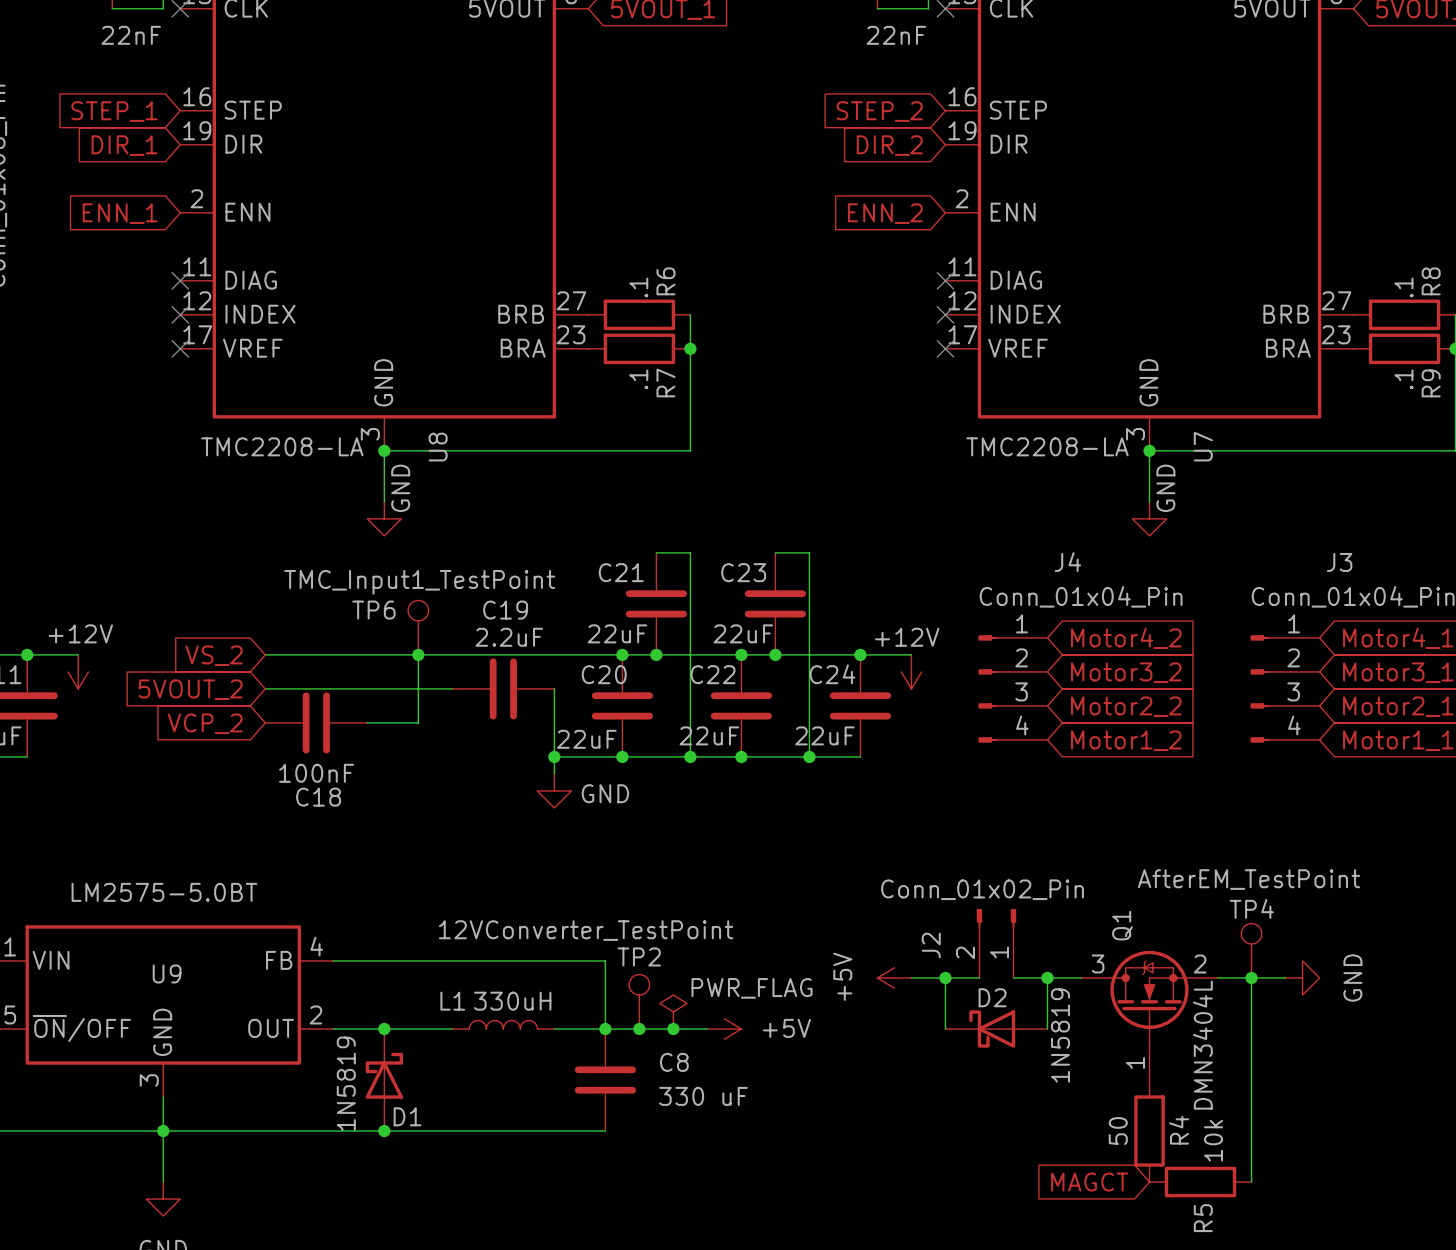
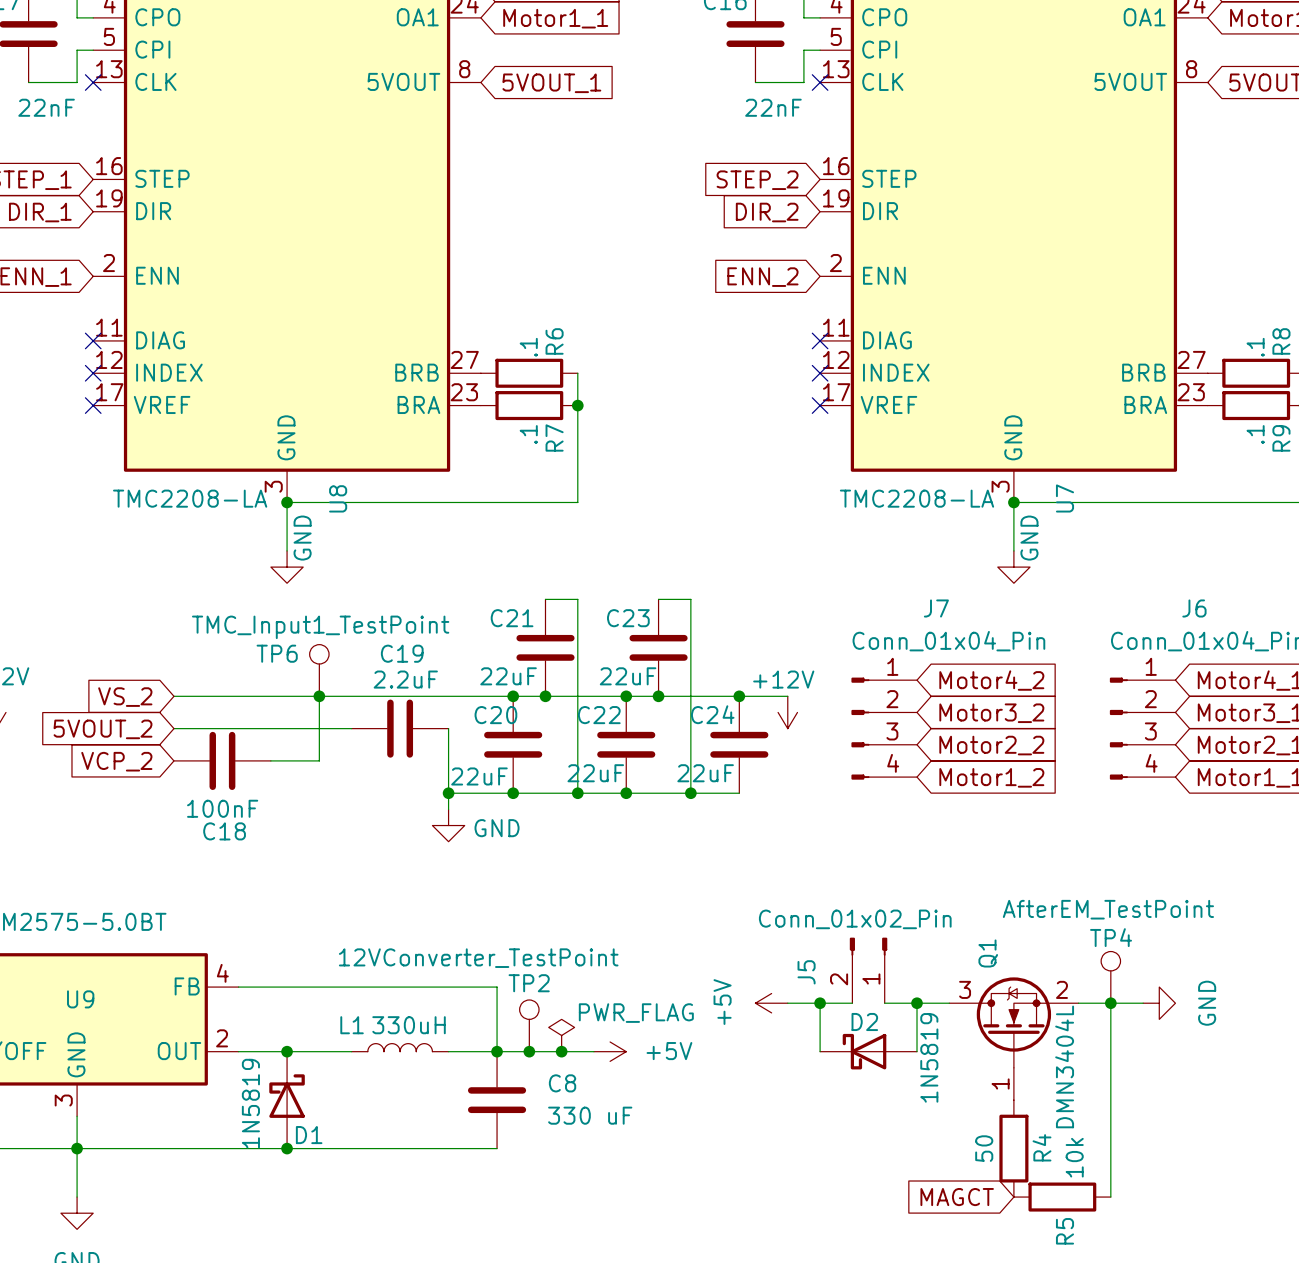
J4 name: J4 (1067, 562) -> J7 (936, 608)
J3 name: J3 (1339, 562) -> J6 (1194, 608)
J2 name: J2 (931, 945) -> J5 (806, 972)

